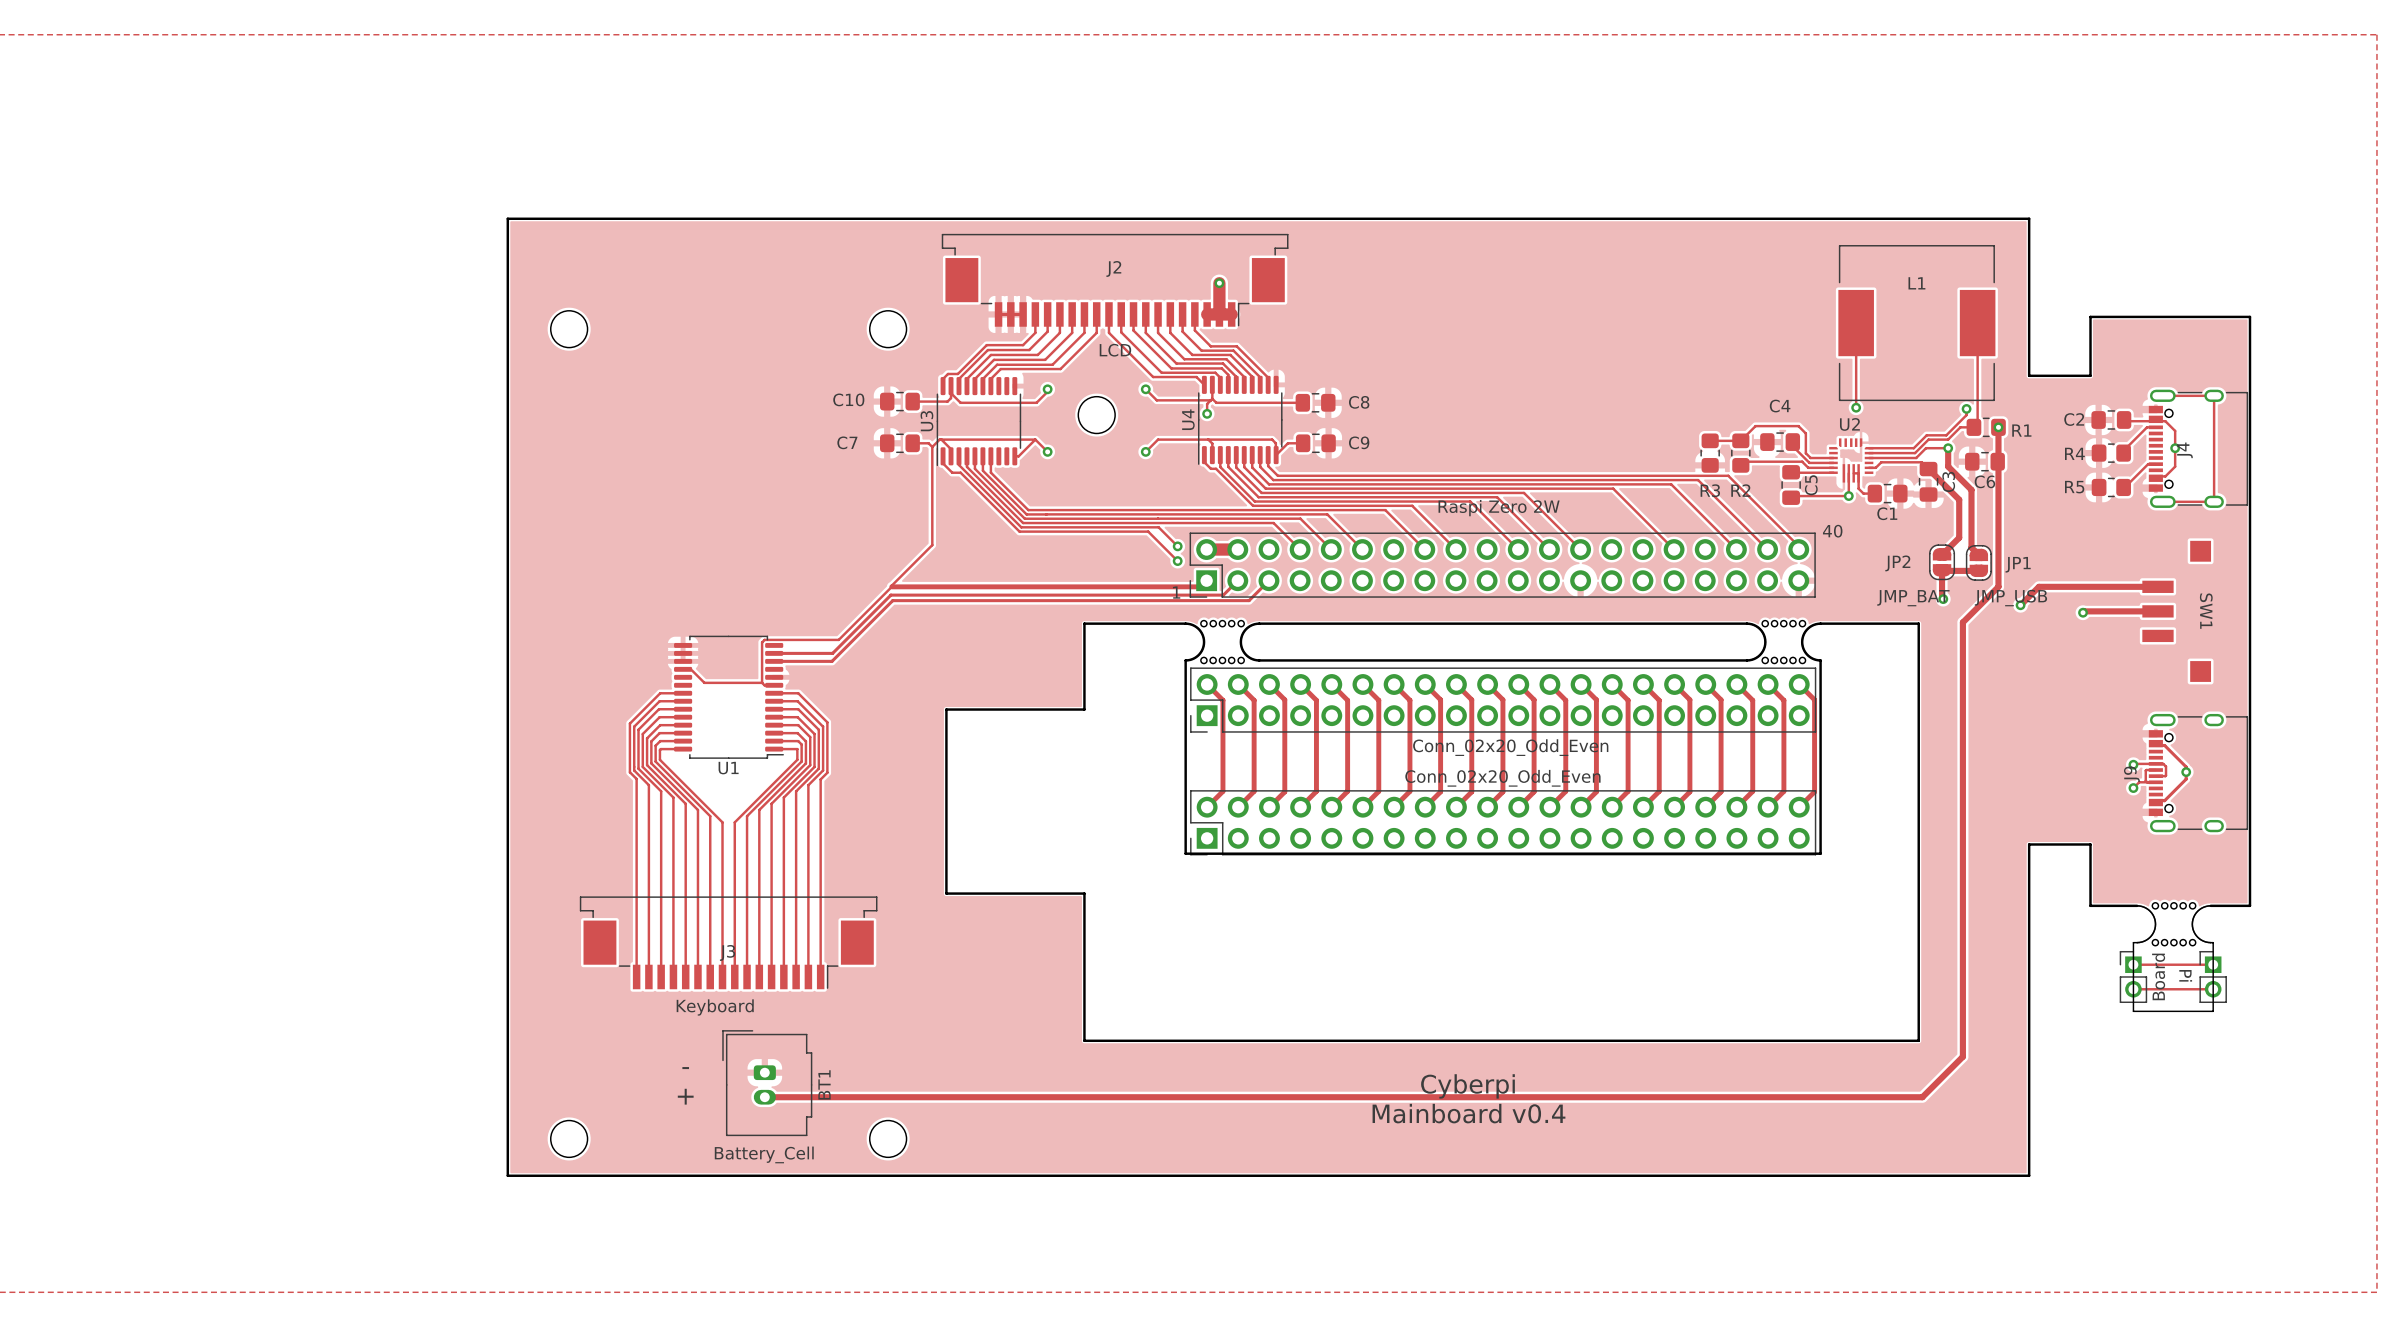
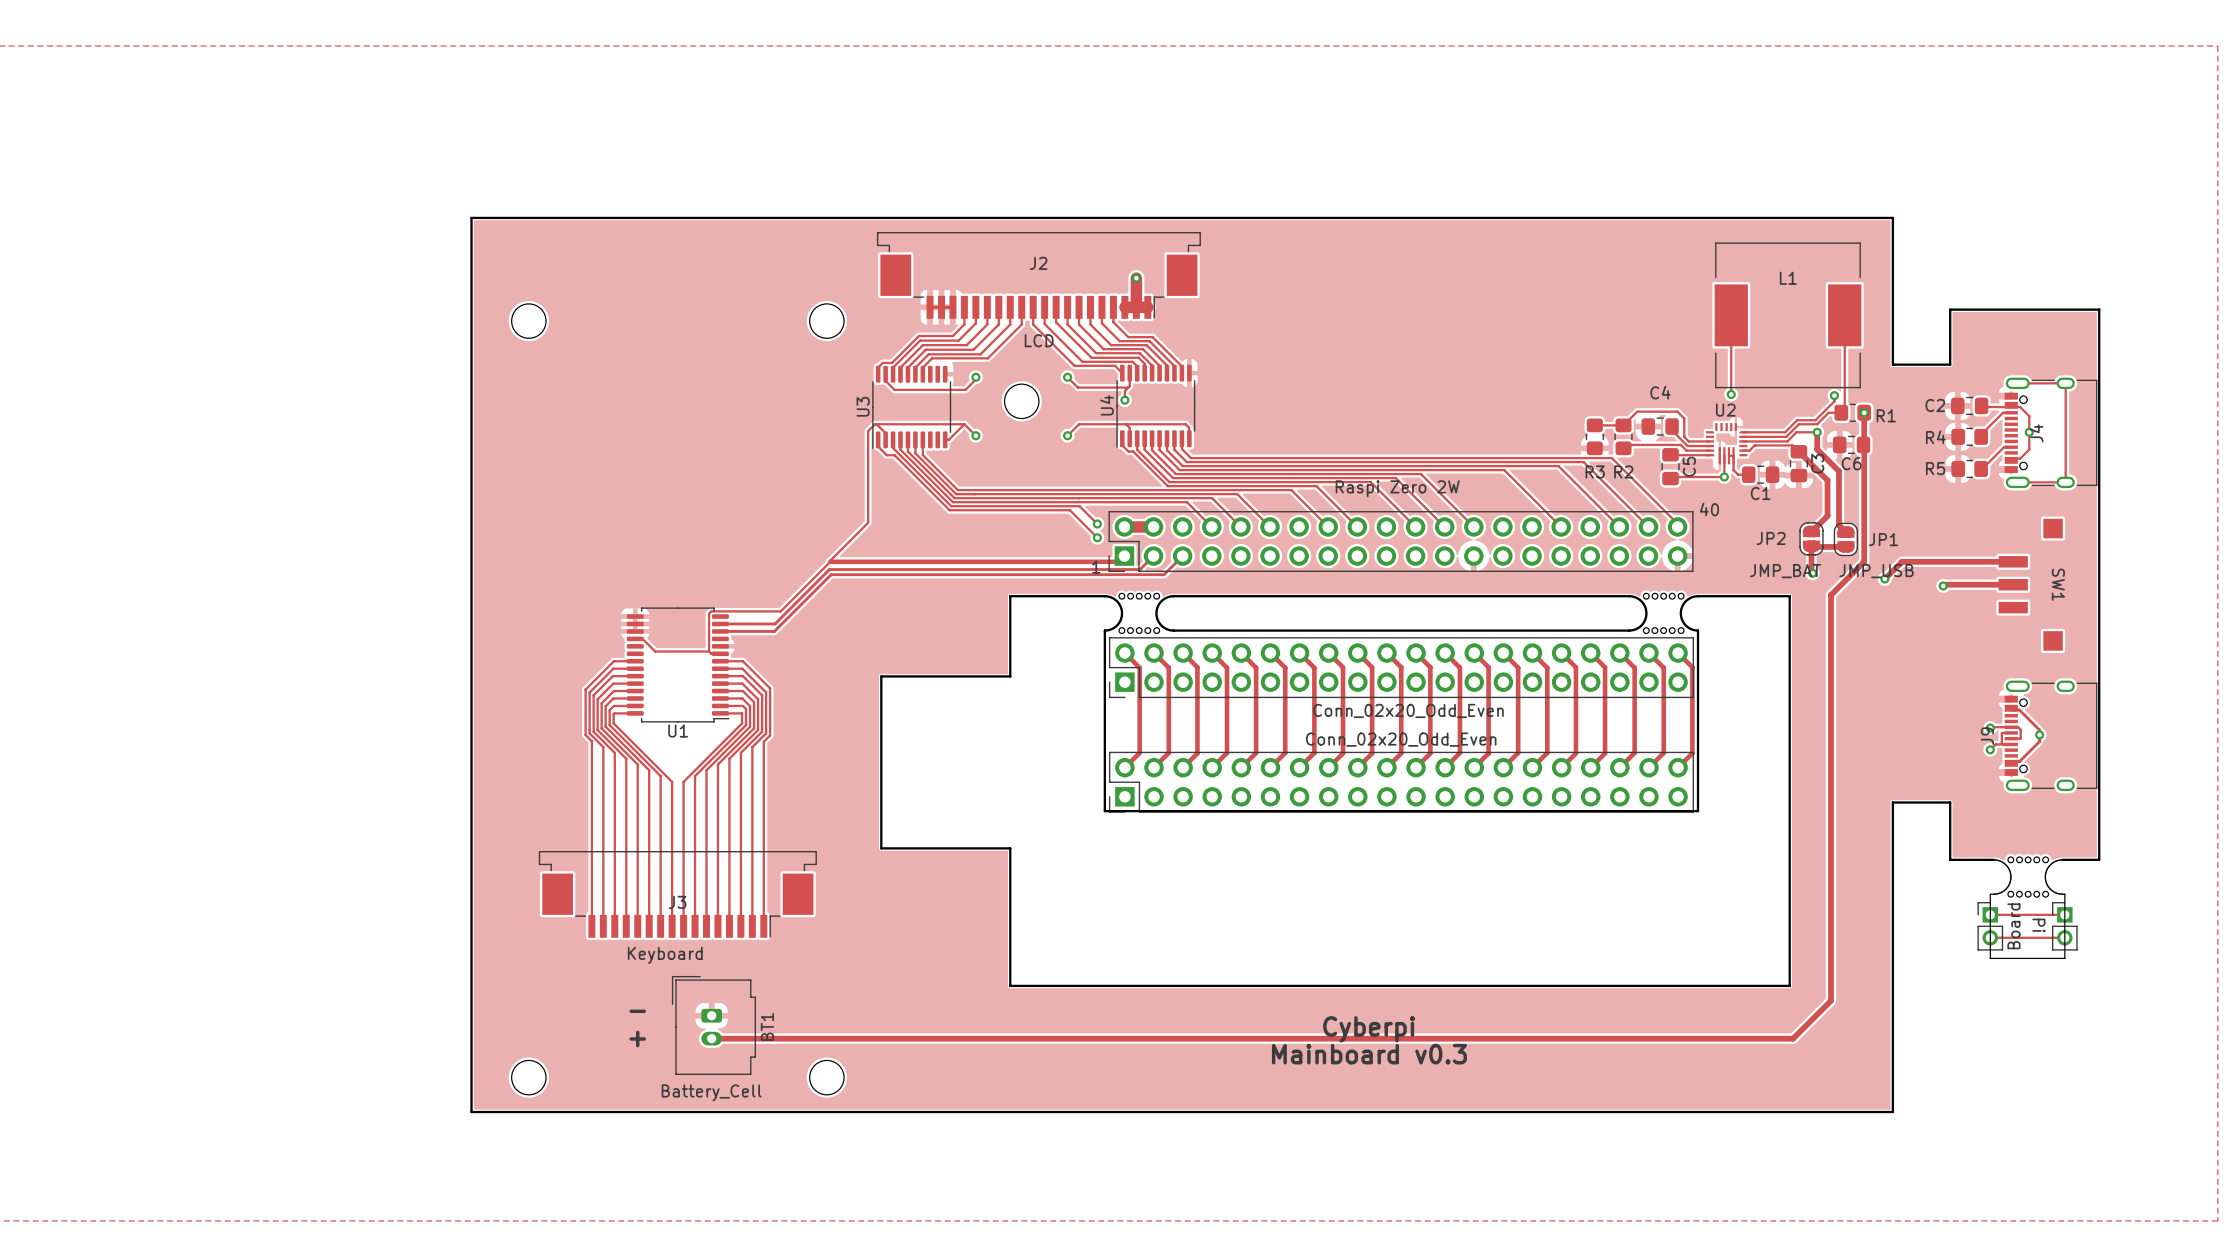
track: (951, 393) (951, 398) (947, 401) (912, 401) -> none
track: (1212, 398) (1216, 402) (1302, 402) -> none
C10: (899, 401) -> none
C8: (1315, 402) -> none
C7: (899, 443) -> none
track: (912, 443) (928, 443) (932, 446) -> none
track: (1303, 443) (1287, 443) (1276, 455) -> none
C9: (1315, 443) -> none
text: Mainboard v0.4 (1468, 1113) -> Mainboard v0.3 (1369, 1054)

